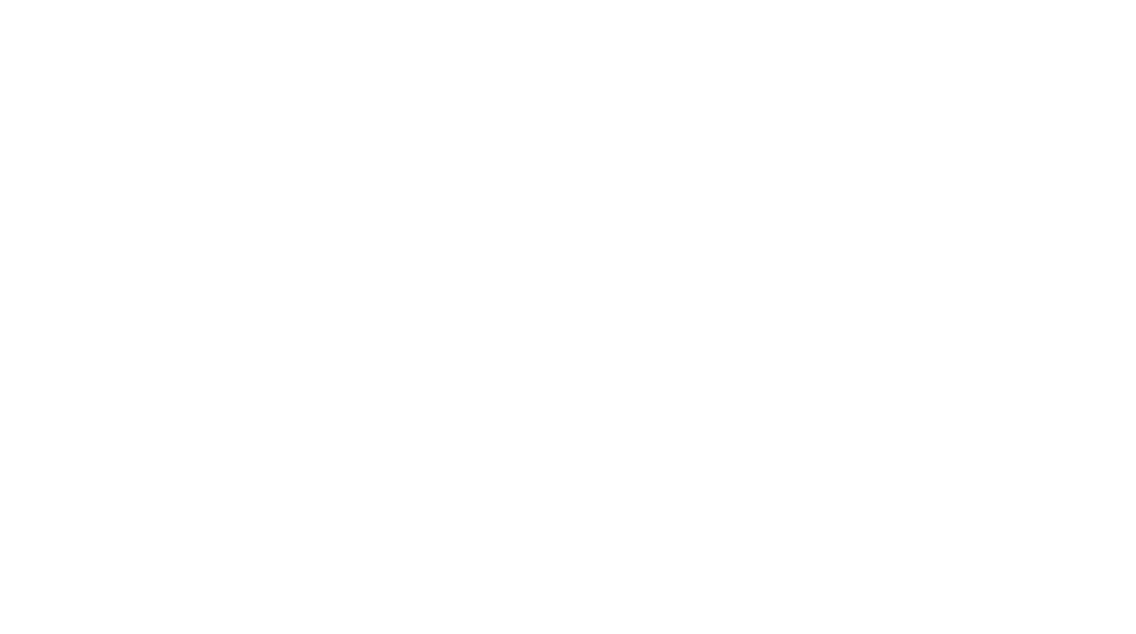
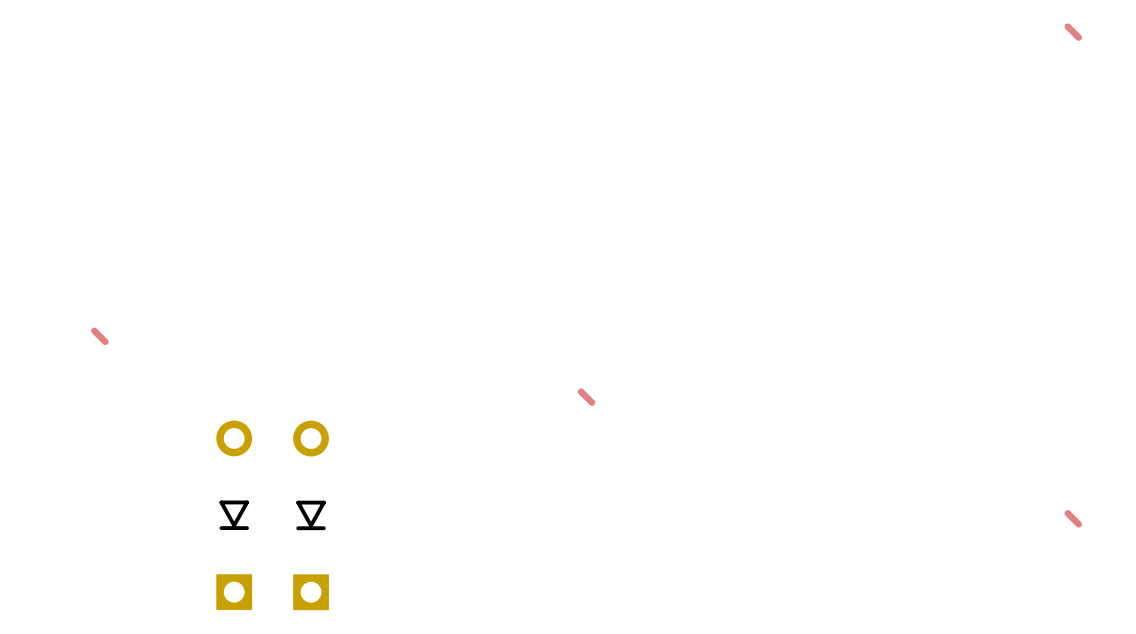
track: none -> (1067, 26) (1078, 37)
track: none -> (94, 330) (105, 341)
track: none -> (581, 391) (592, 402)
track: none -> (1067, 513) (1078, 524)
part: none -> (234, 515)
part: none -> (311, 515)

